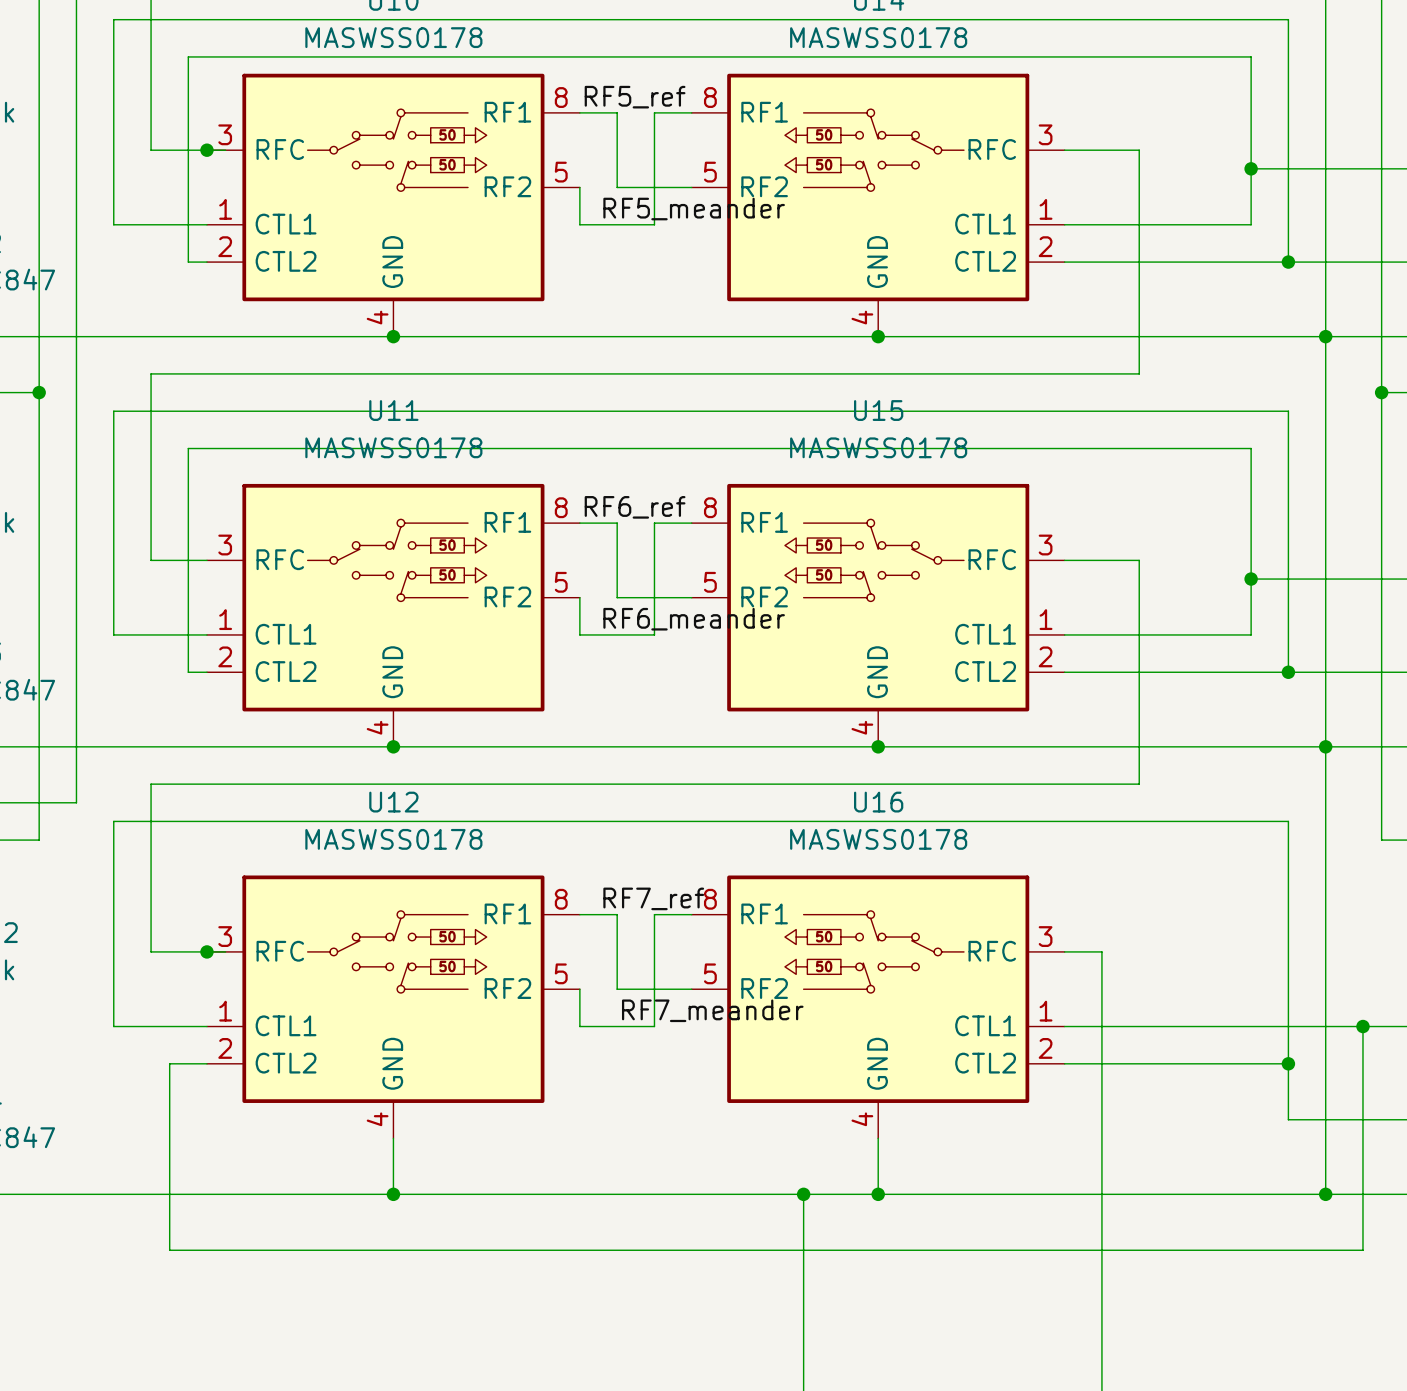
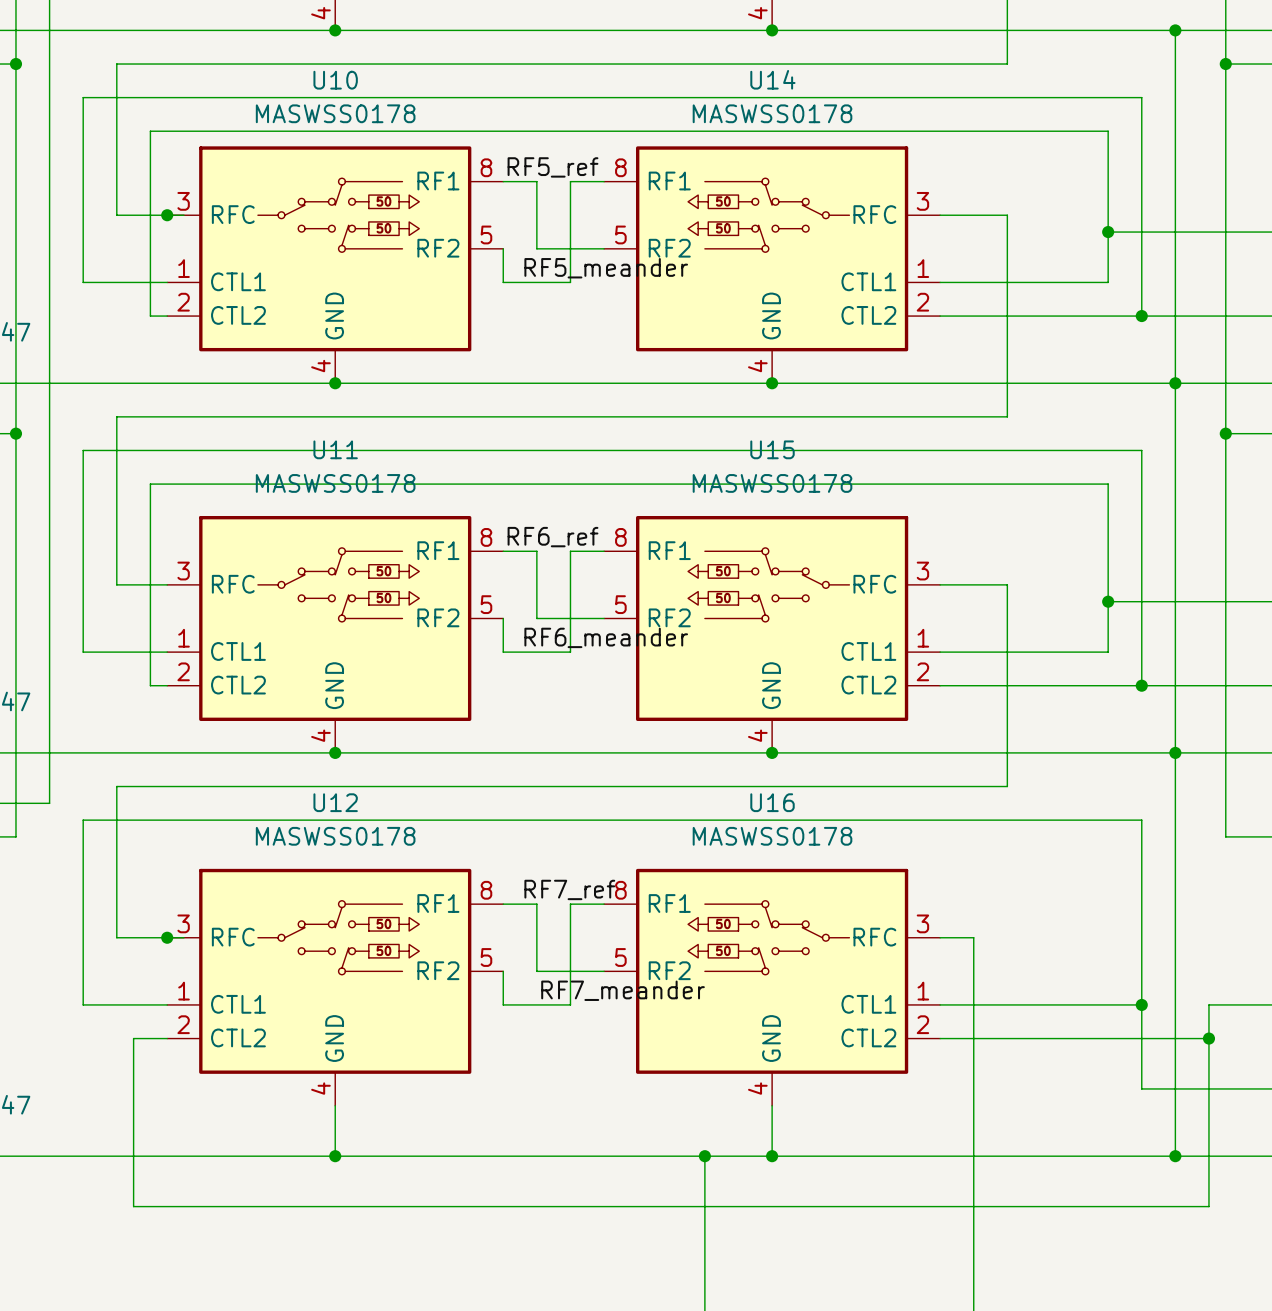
wire: (1288, 1026) (1362, 1026) -> (1141, 1038) (1208, 1038)
junction: none -> (1141, 1004)
junction: (1362, 1026) -> none
junction: (1288, 1063) -> none
junction: none -> (1208, 1038)

